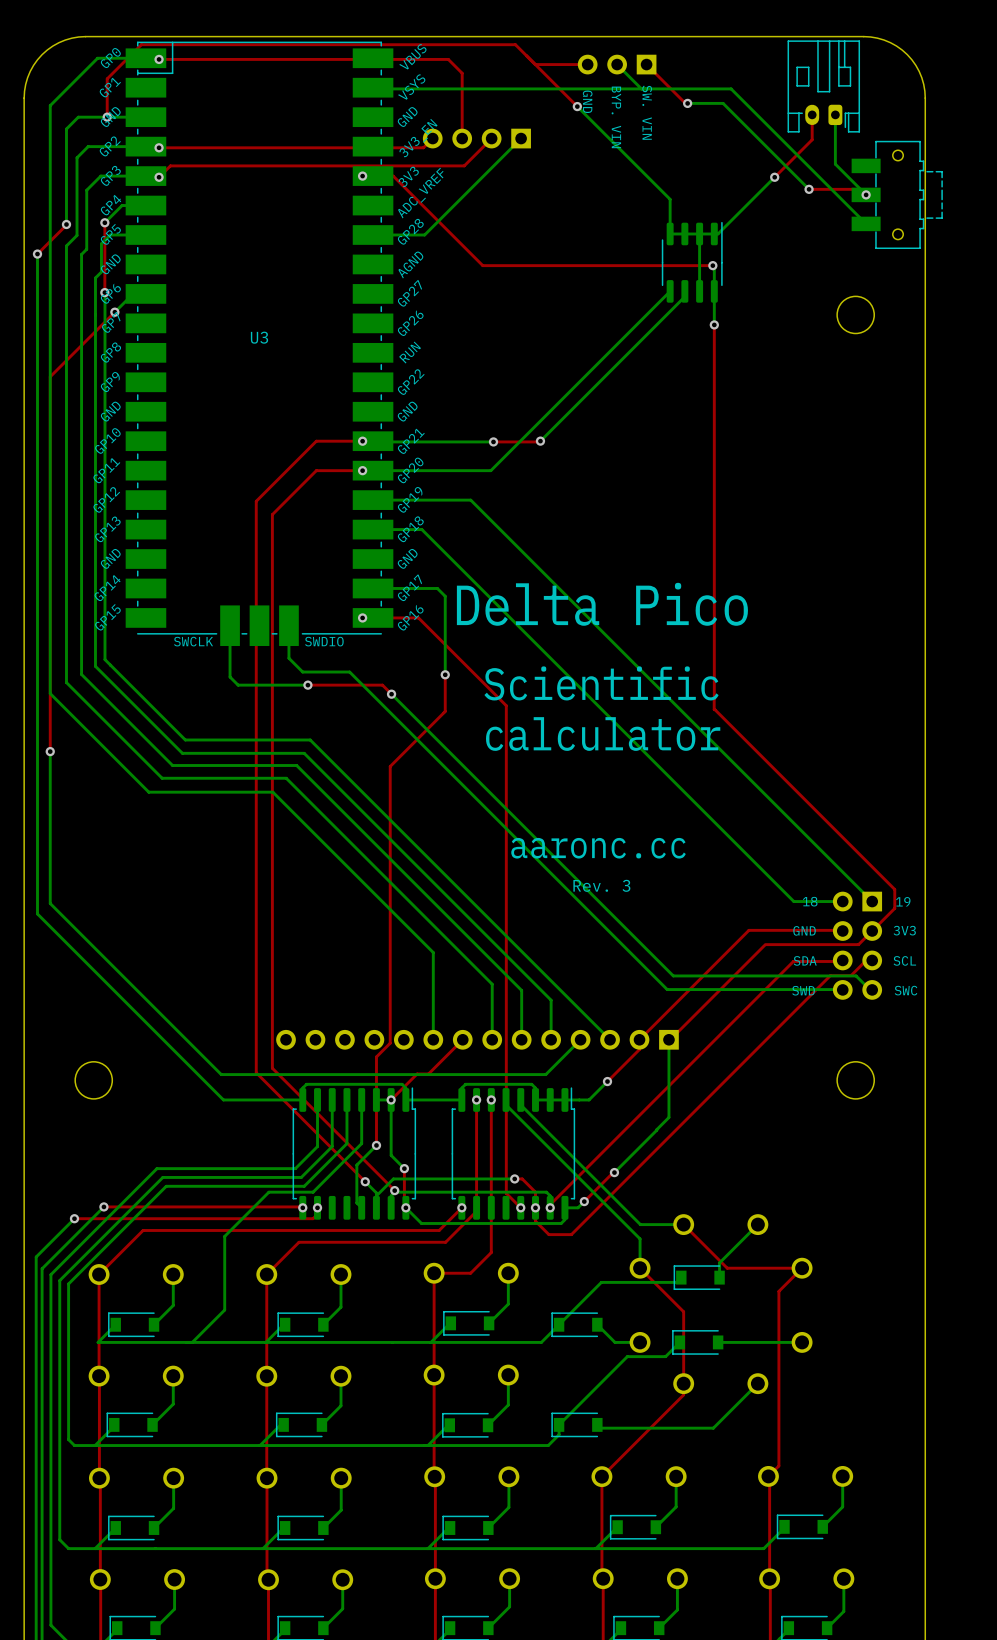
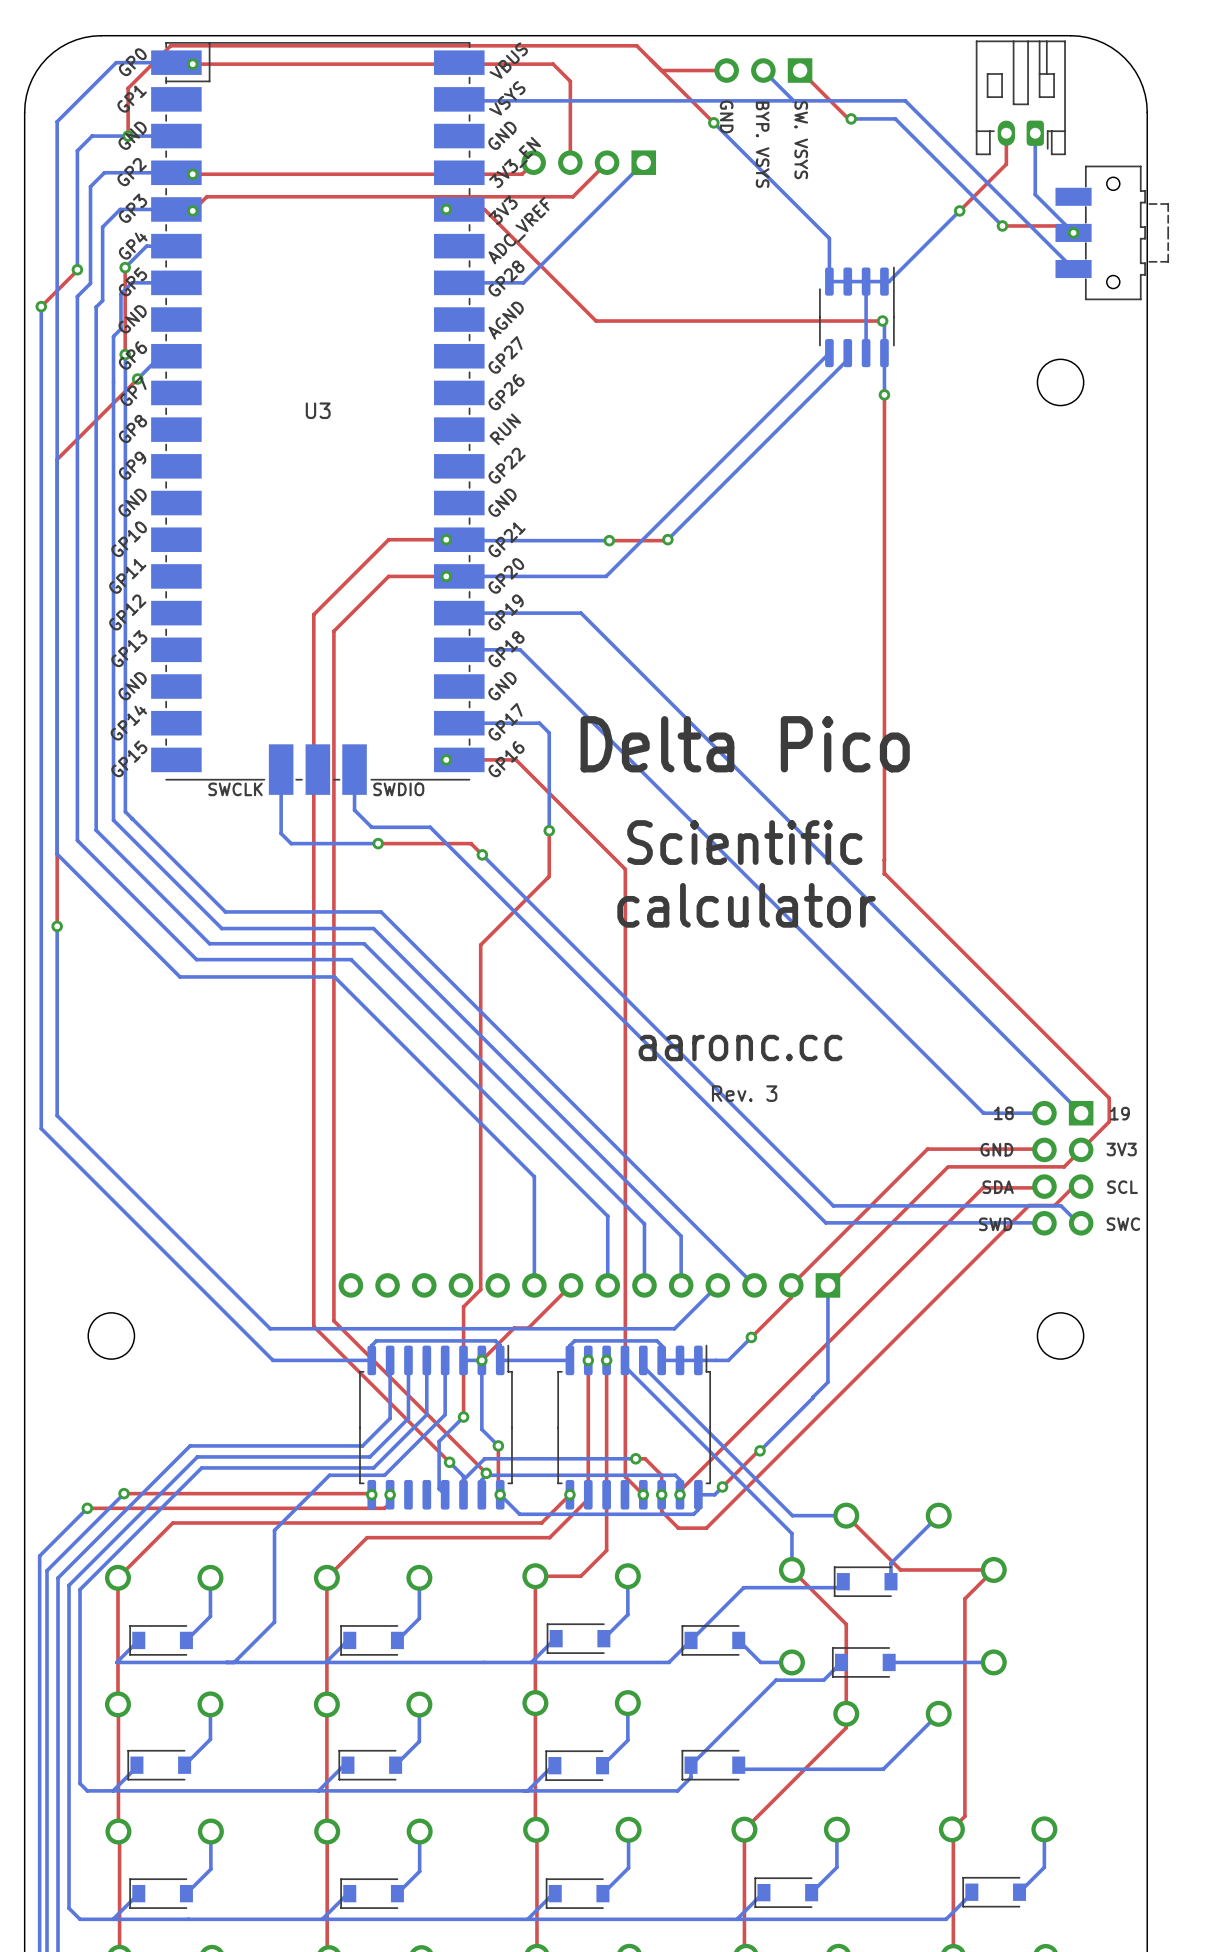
text: SW. VIN (647, 112) -> SW. VSYS (801, 140)
text: BYP. VIN (616, 117) -> BYP. VSYS (762, 144)

